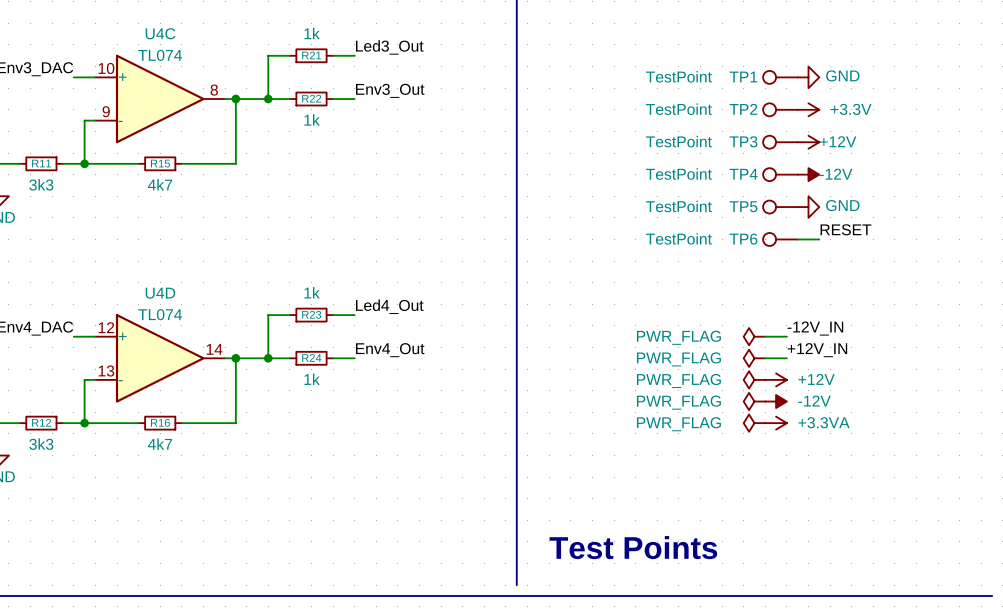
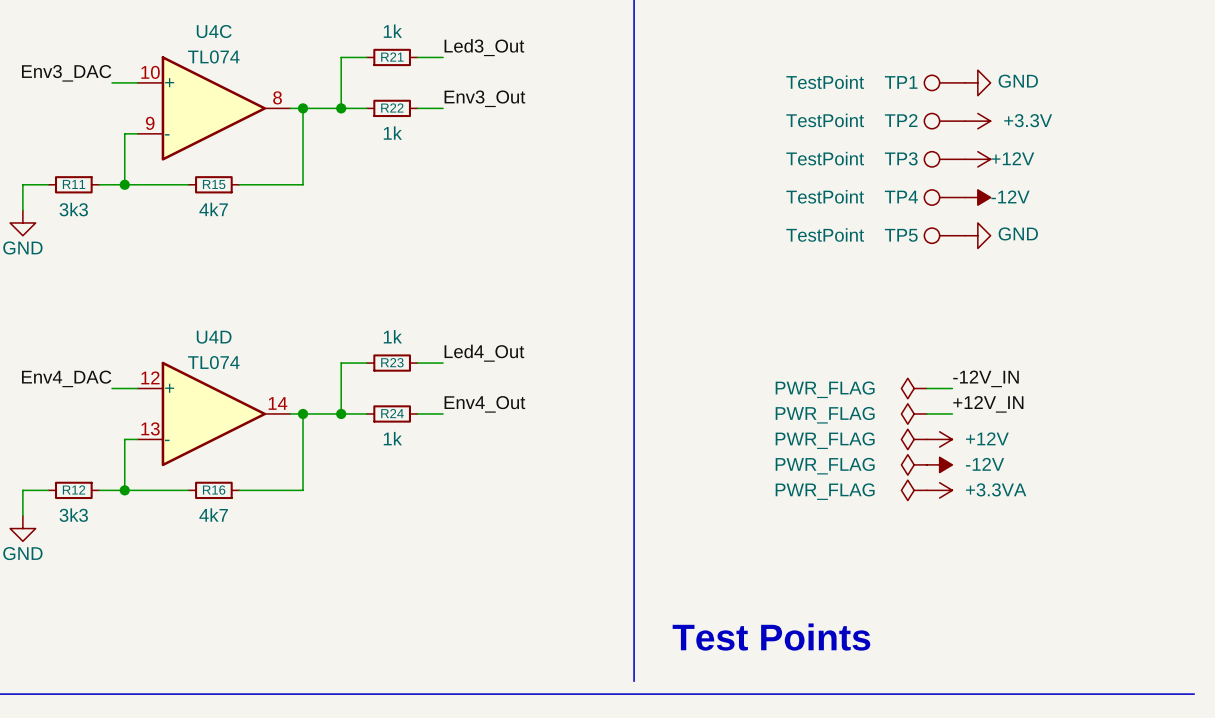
label: RESET (845, 229) -> none
TP6: TestPoint (780, 239) -> none
wire: (797, 239) (819, 239) -> none

